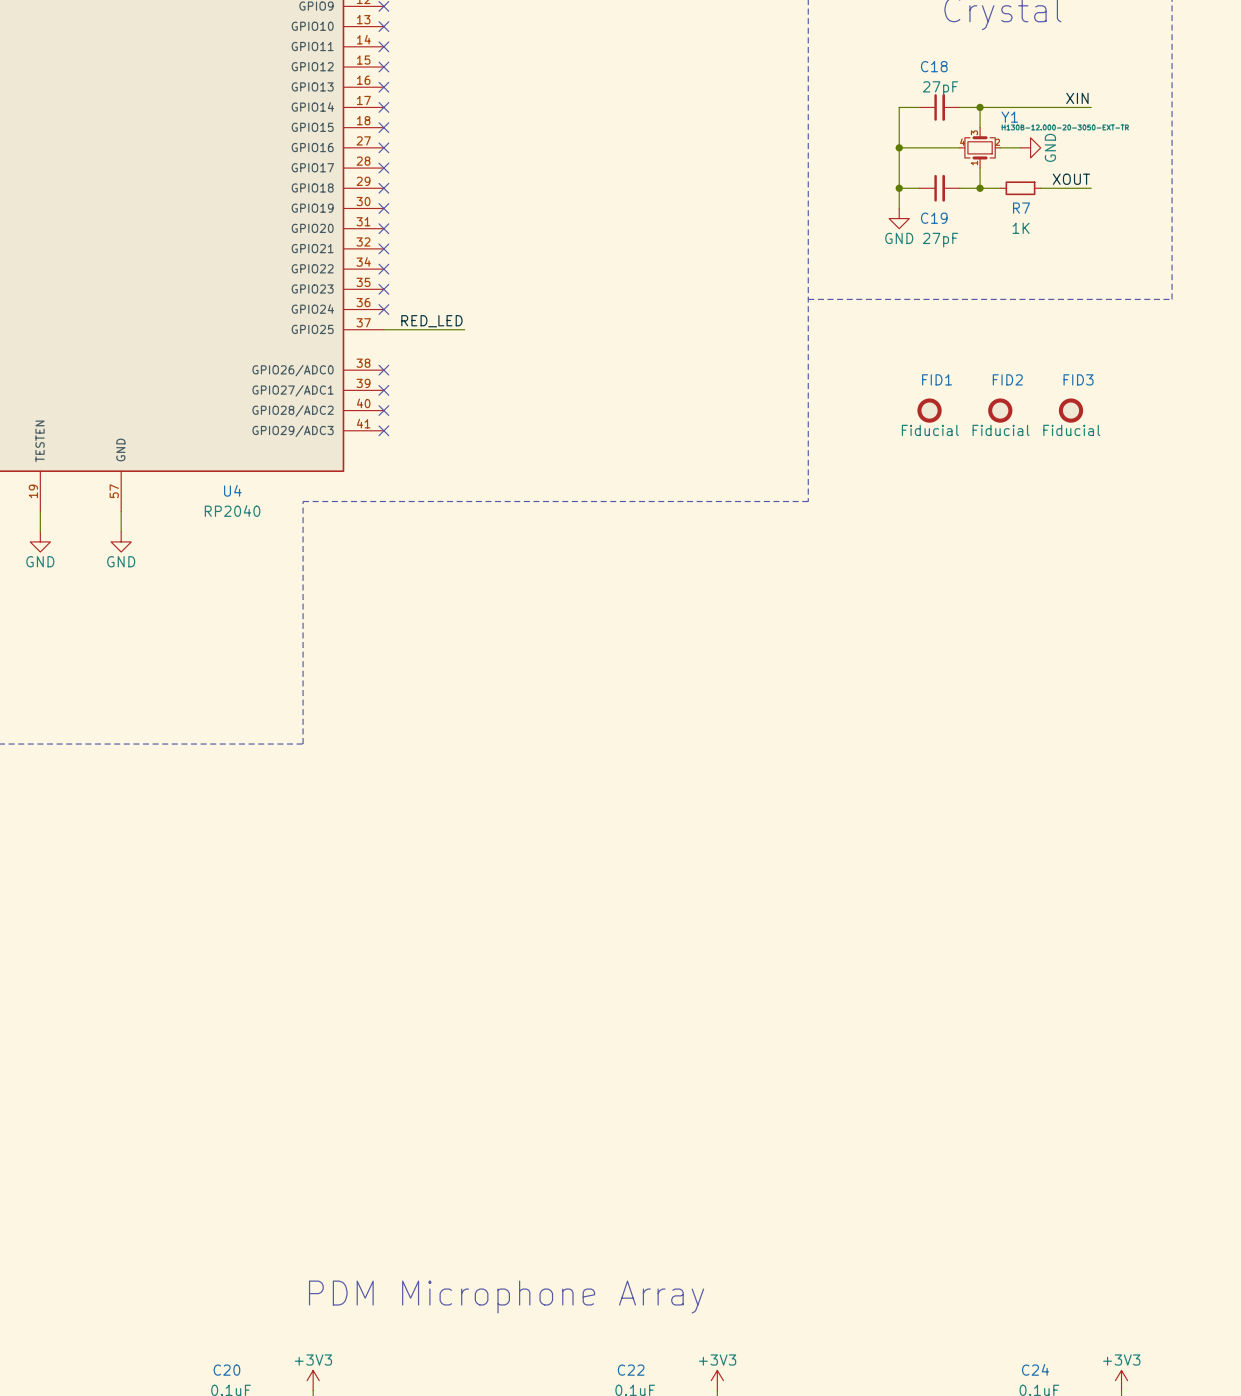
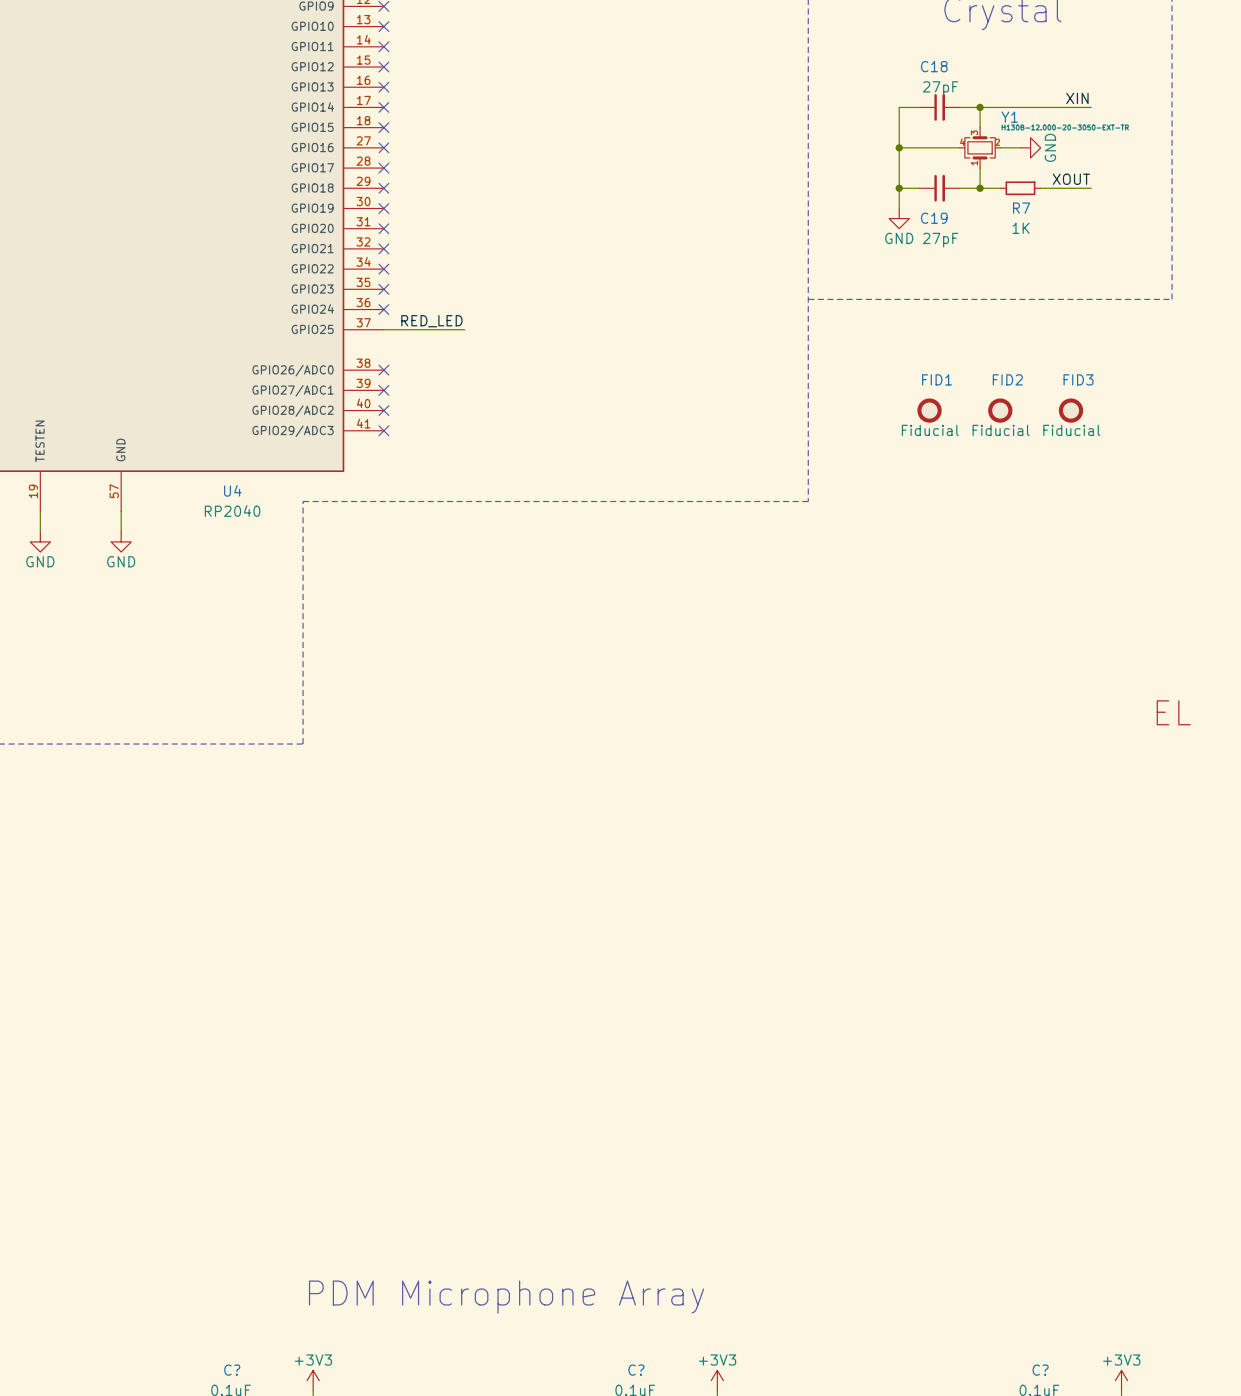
part: none -> (1173, 712)
C24 name: C24 (1035, 1369) -> C? (1040, 1370)
C20 name: C20 (226, 1370) -> C? (232, 1370)
C22 name: C22 (631, 1370) -> C? (636, 1370)

